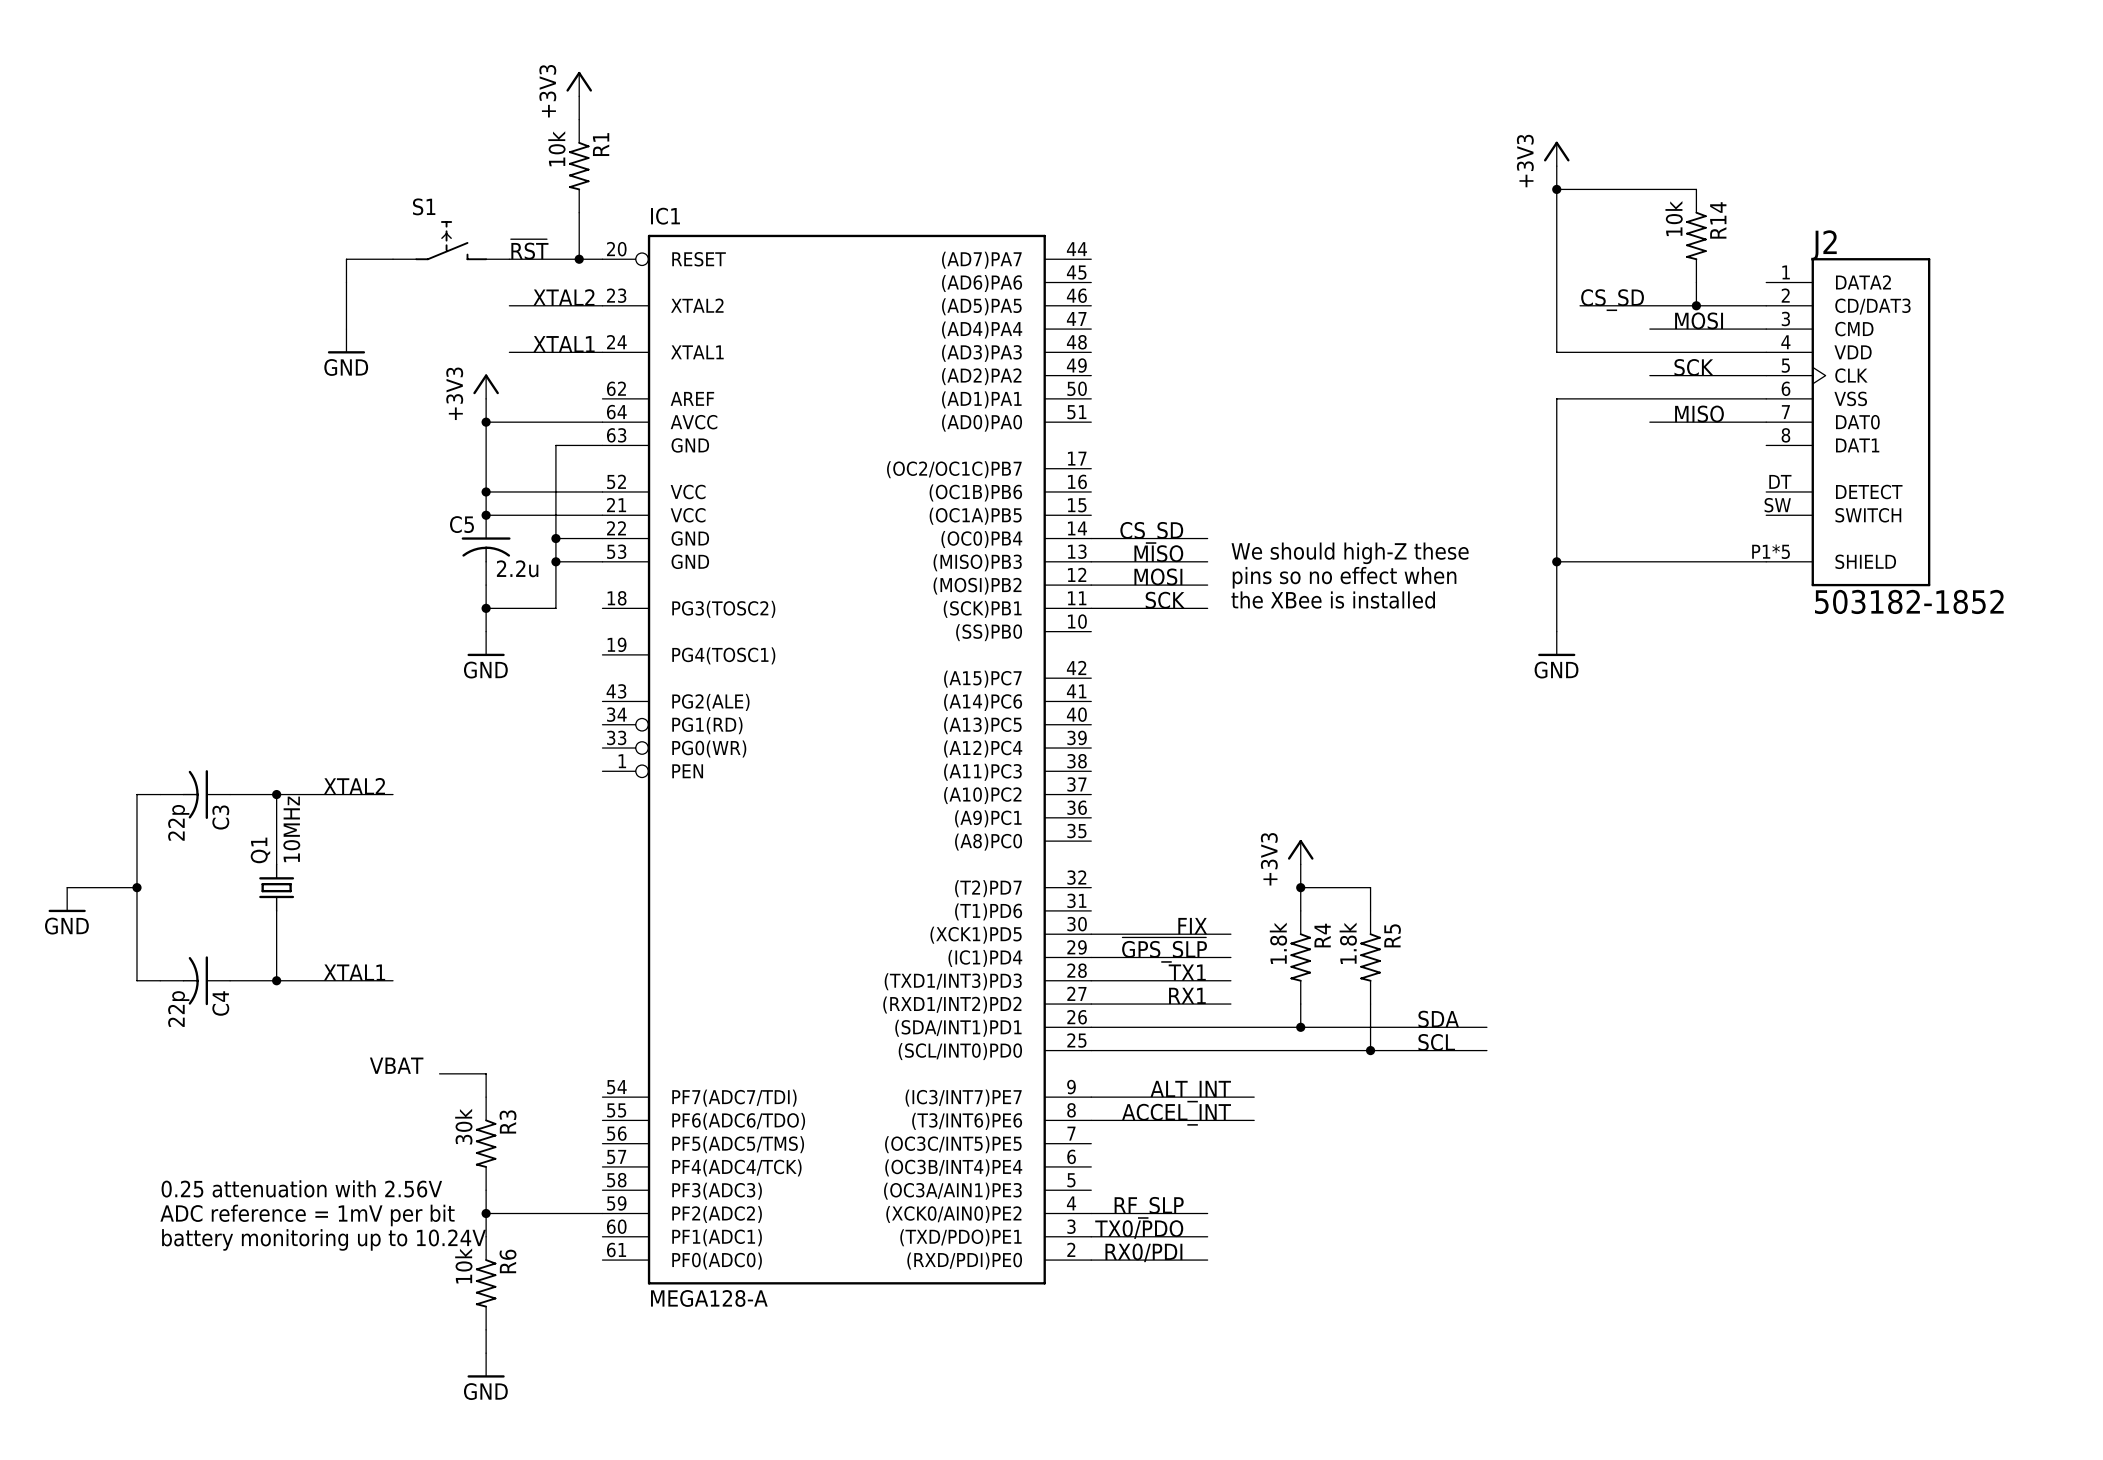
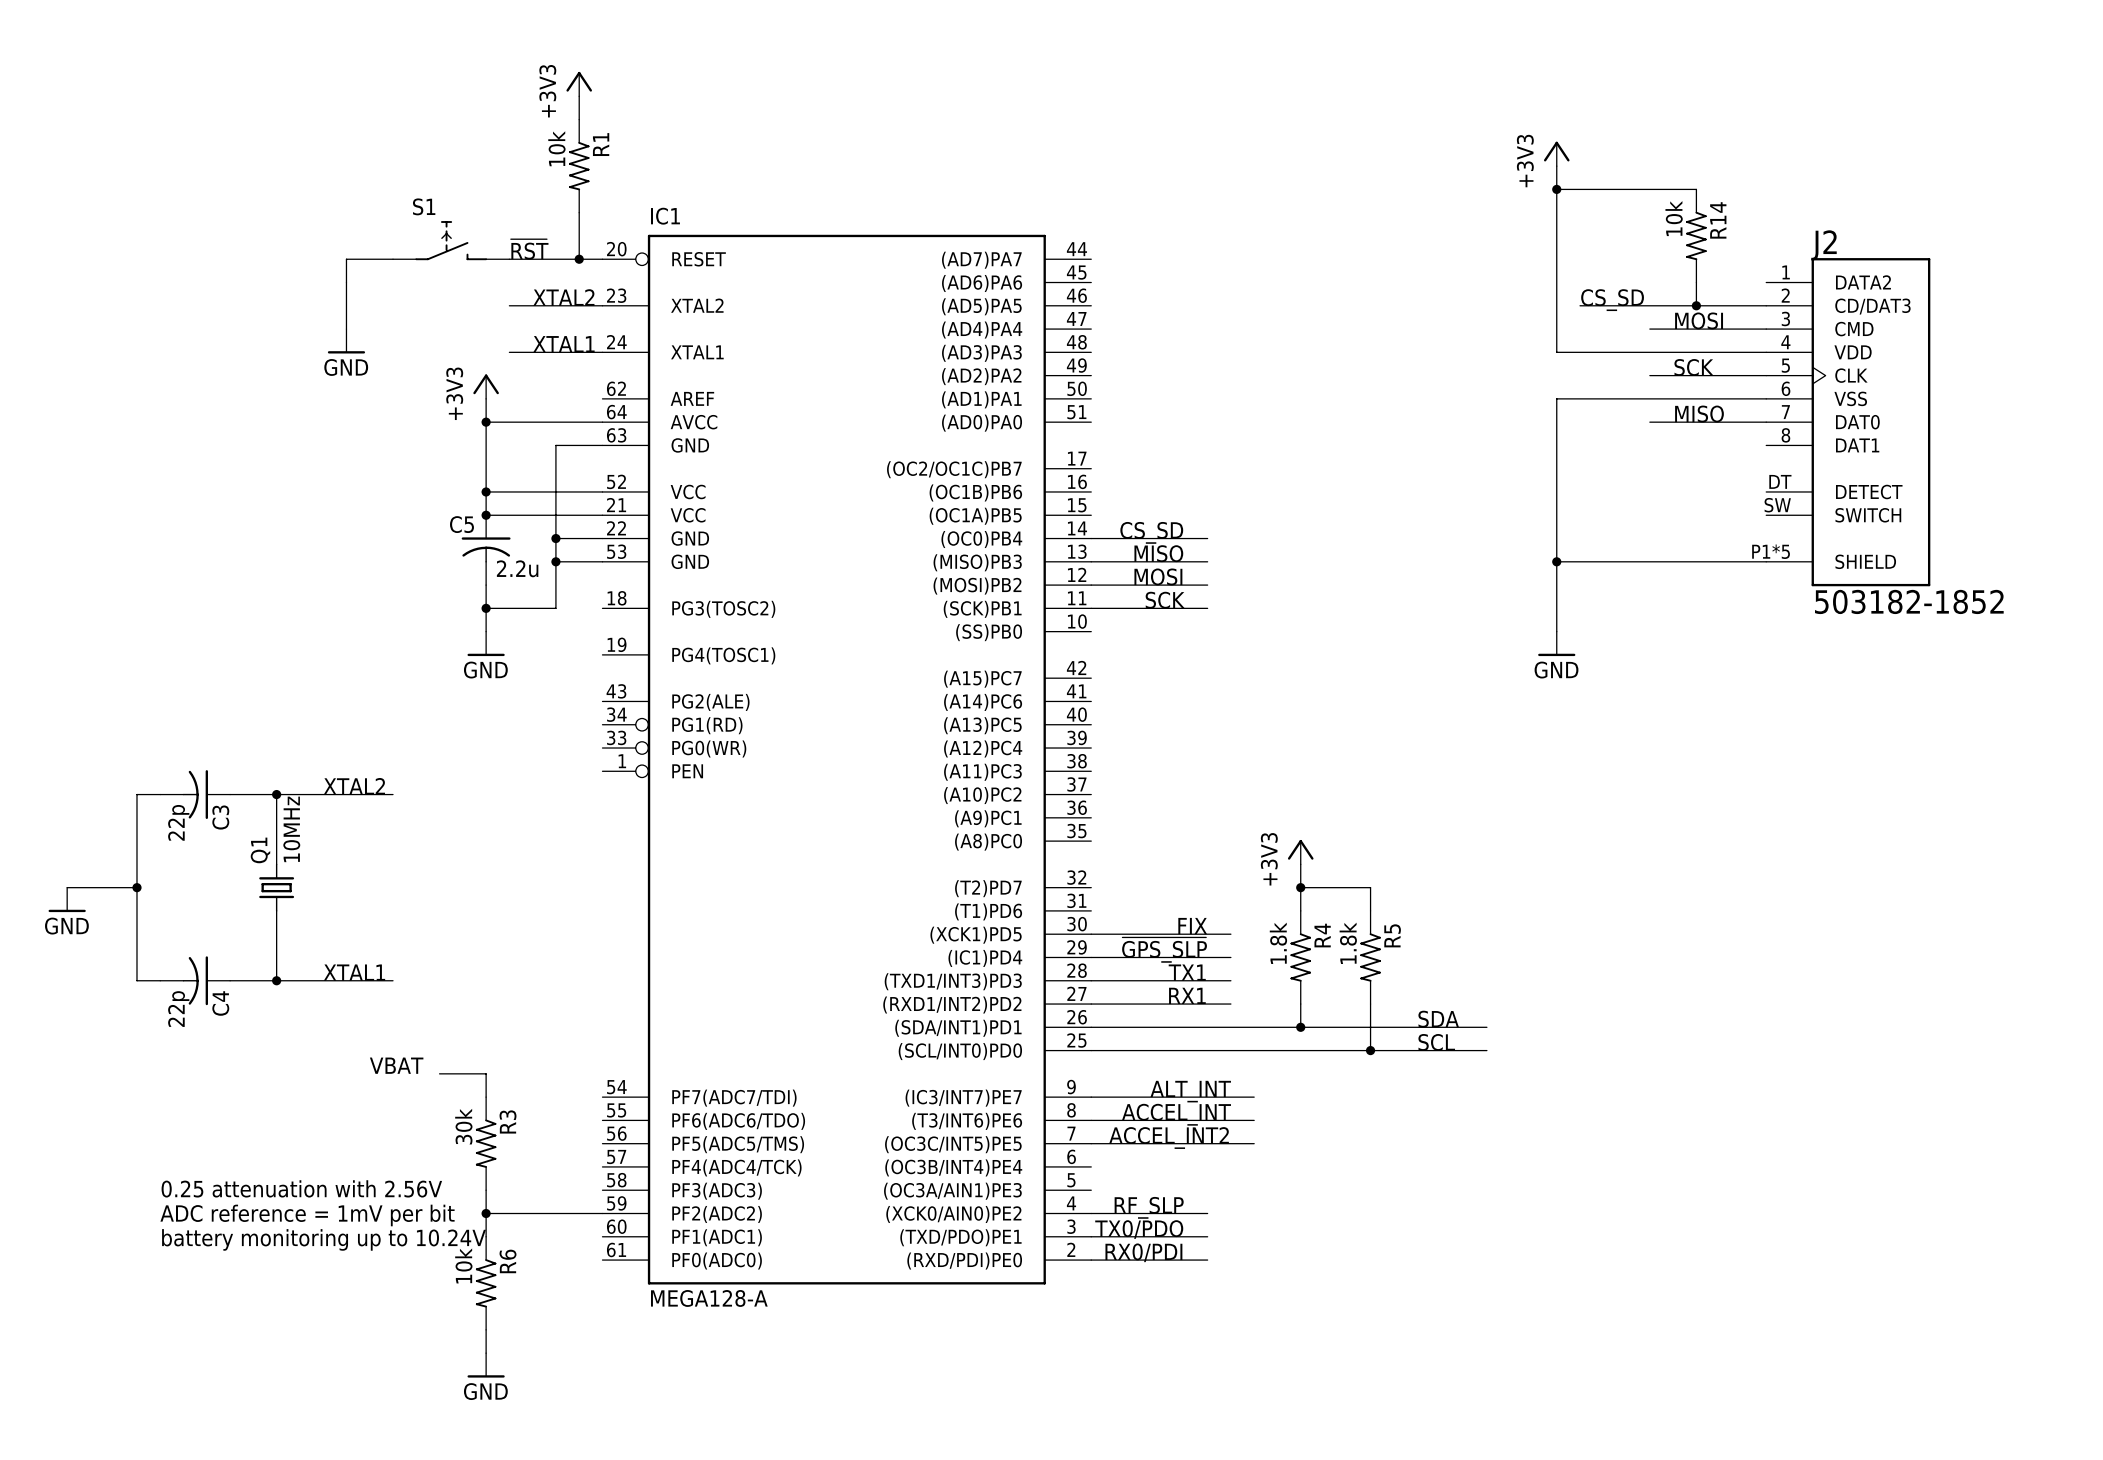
text: We should high-Z these (1350, 553) -> none
text: pins so no effect when (1344, 577) -> none
text: the XBee is installed (1333, 600) -> none
label: none -> ACCEL_INT2 (1169, 1138)
wire: none -> (1091, 1143) (1254, 1143)

